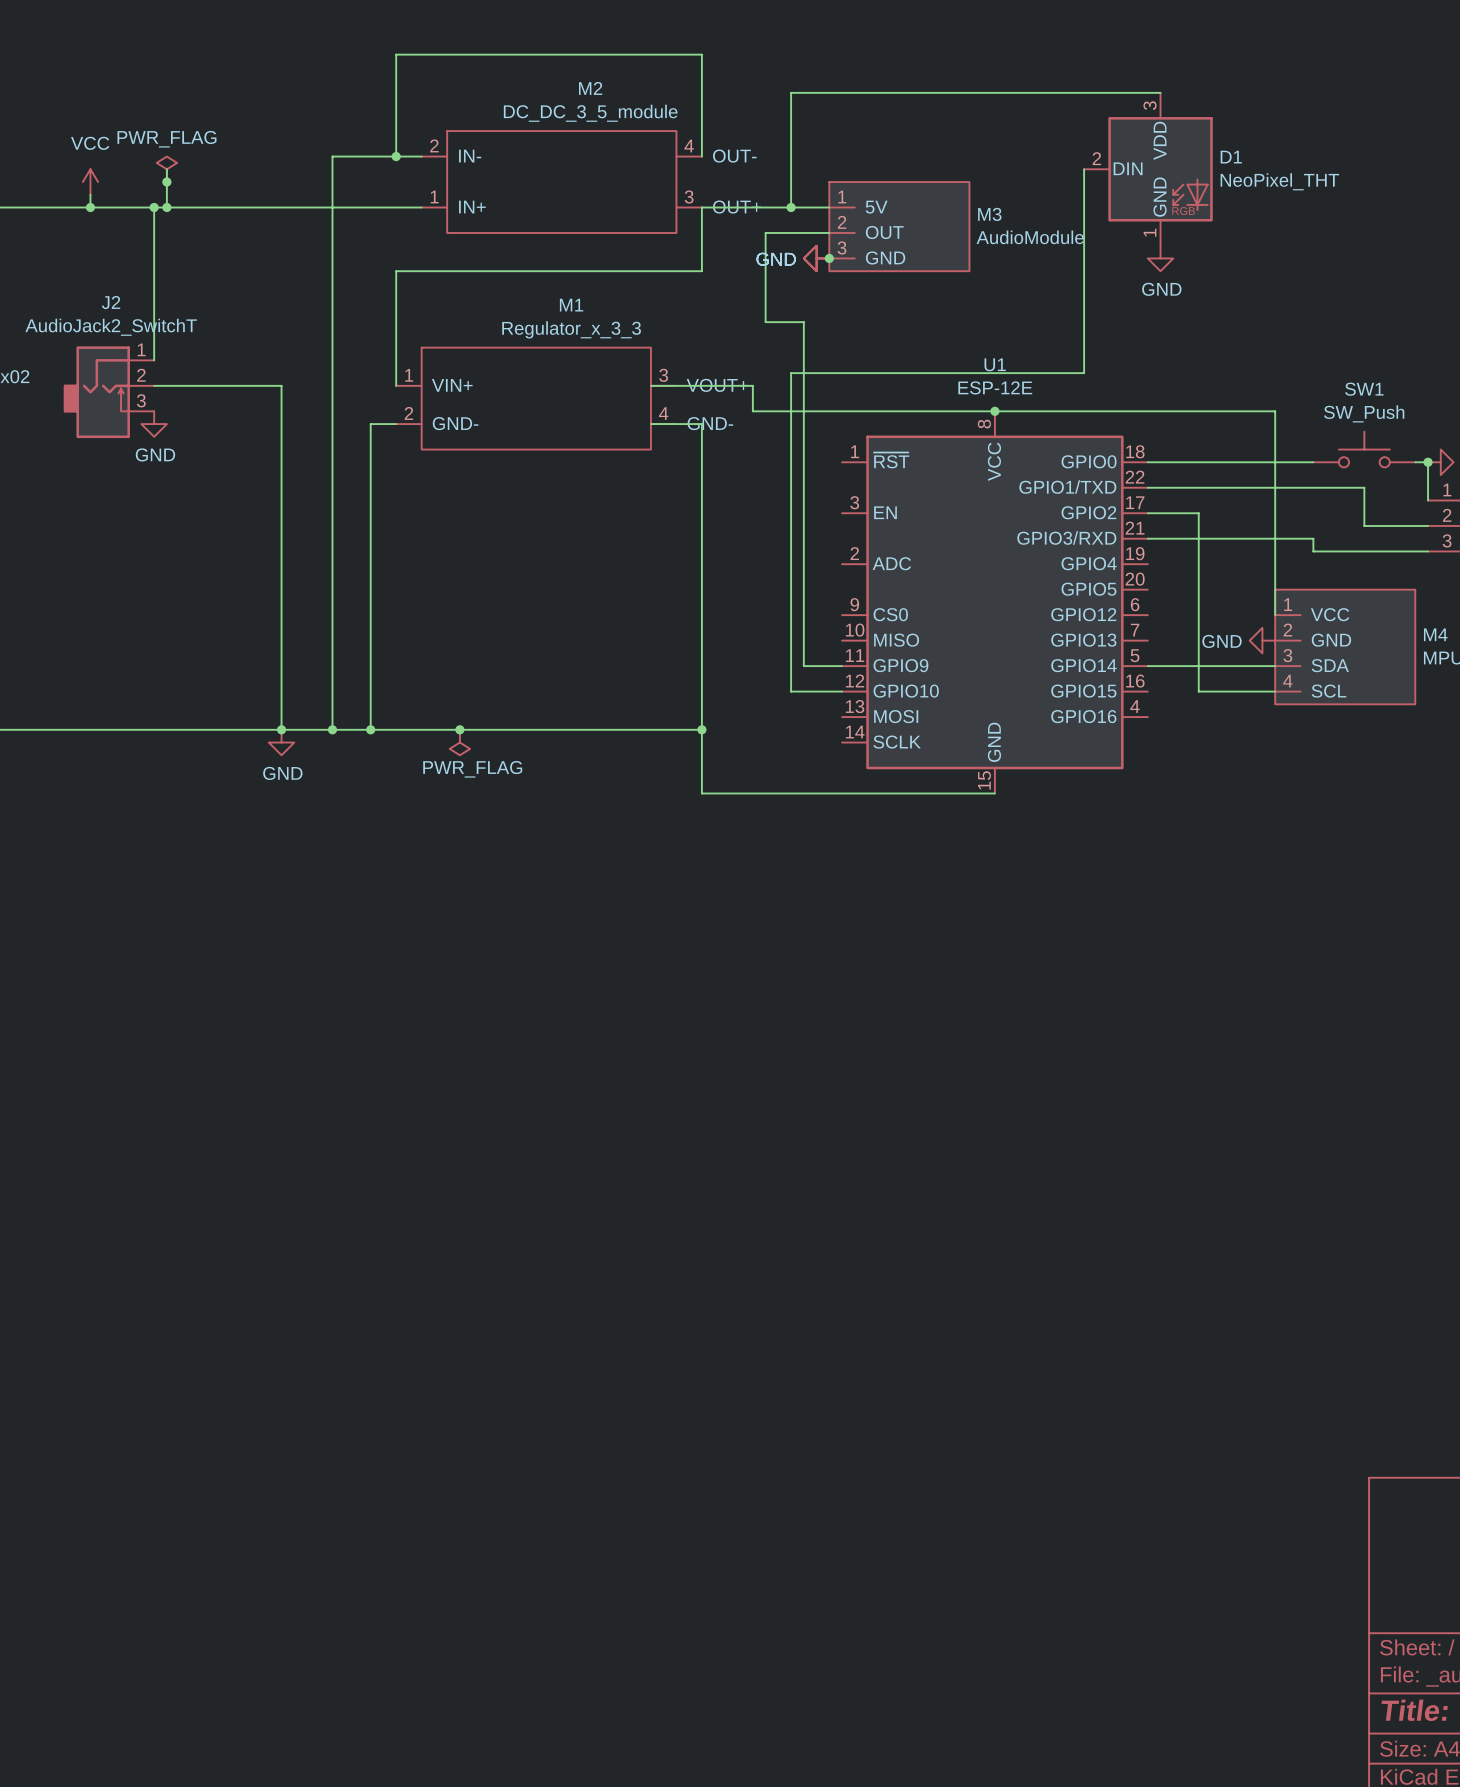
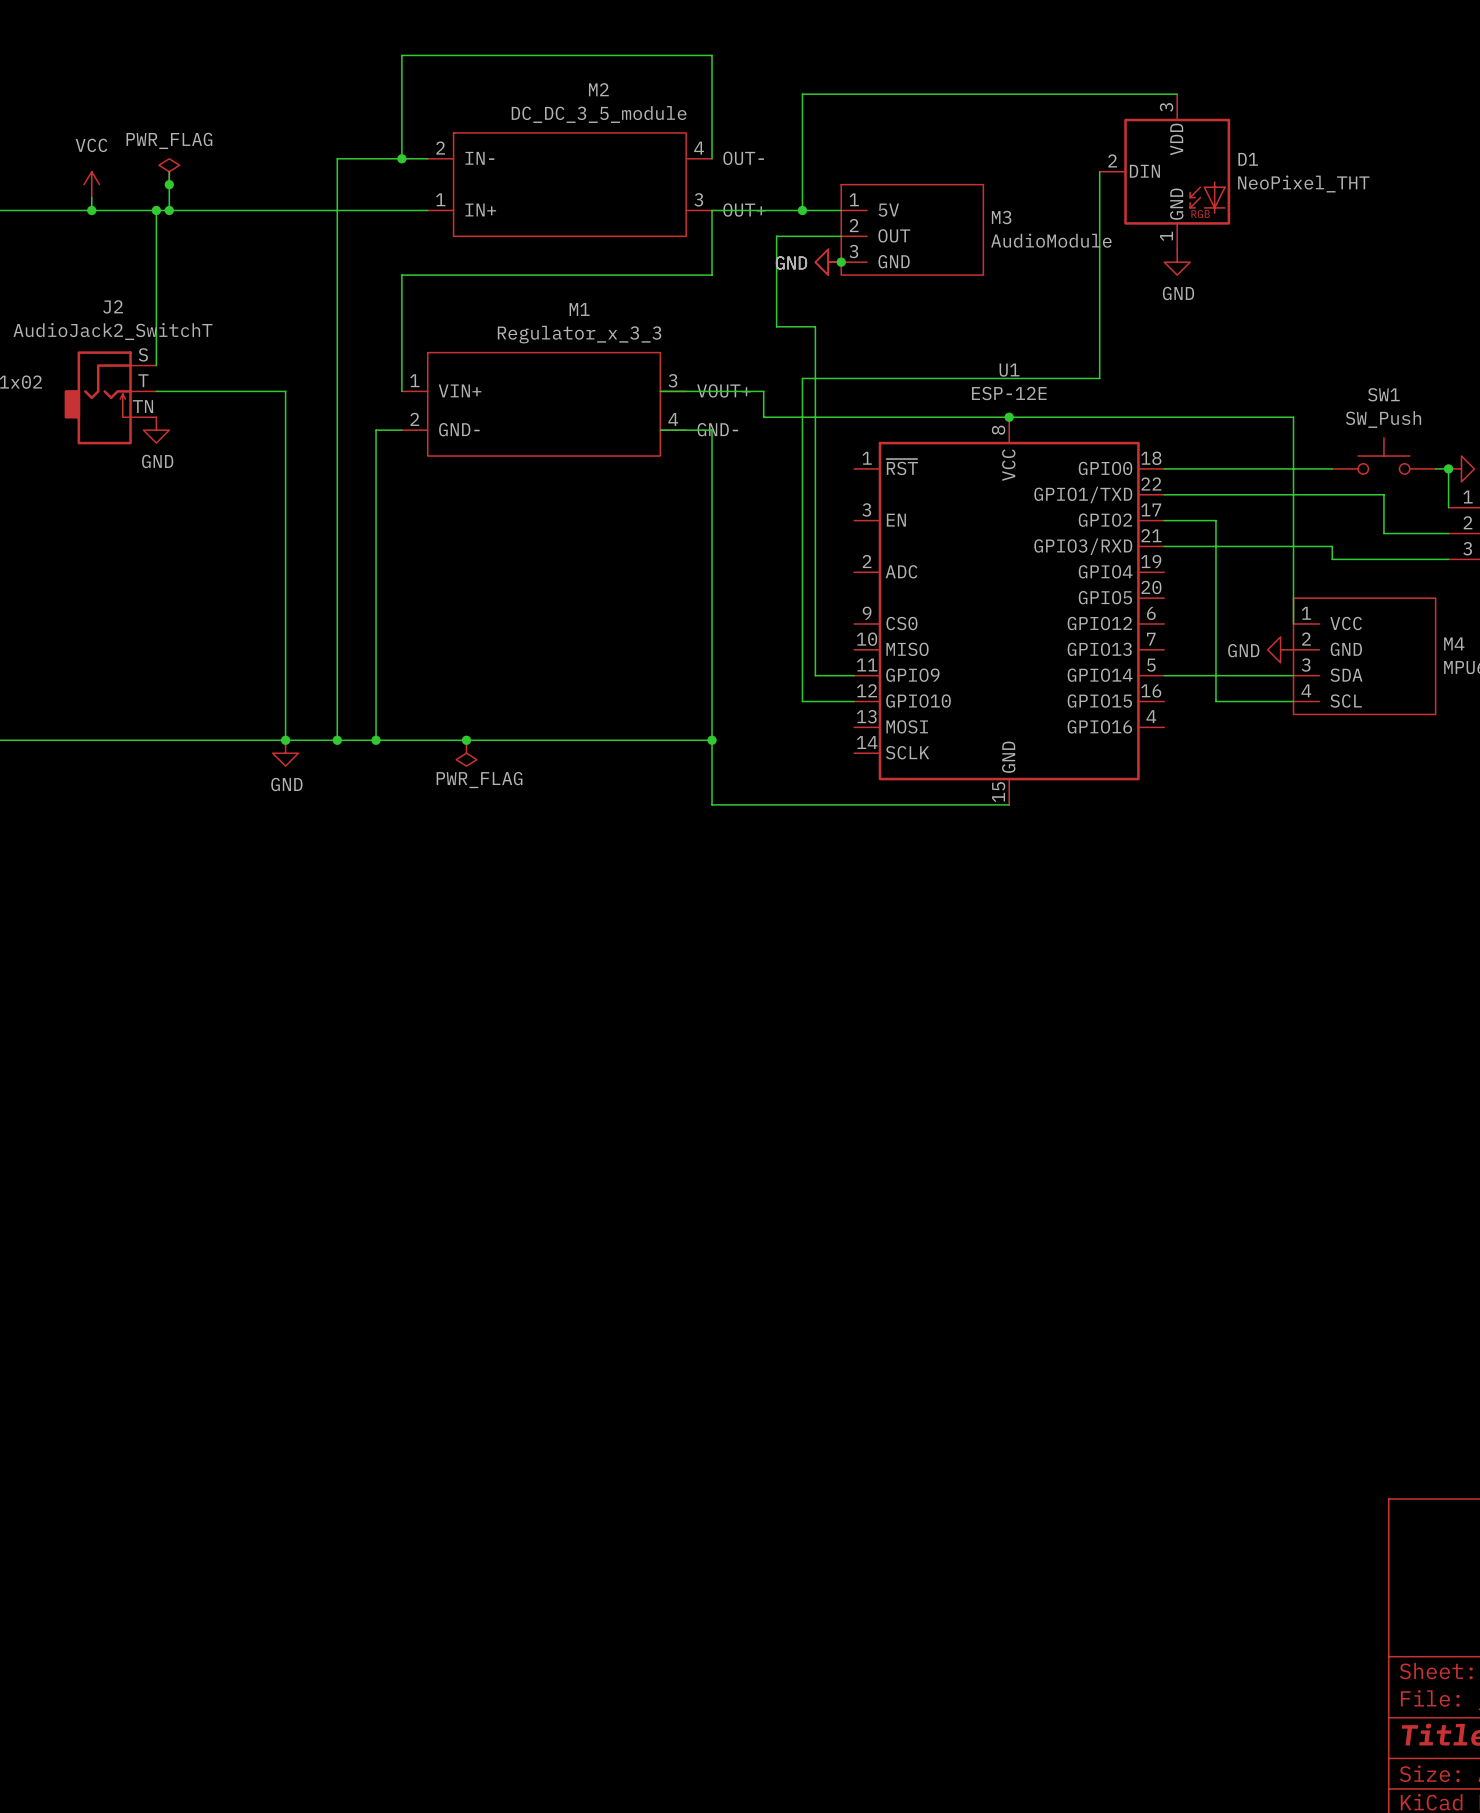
J2 pin number: 1 (141, 349) -> S (143, 354)
J2 pin number: 2 (141, 375) -> T (143, 380)
J2 pin number: 3 (141, 400) -> TN (142, 406)

